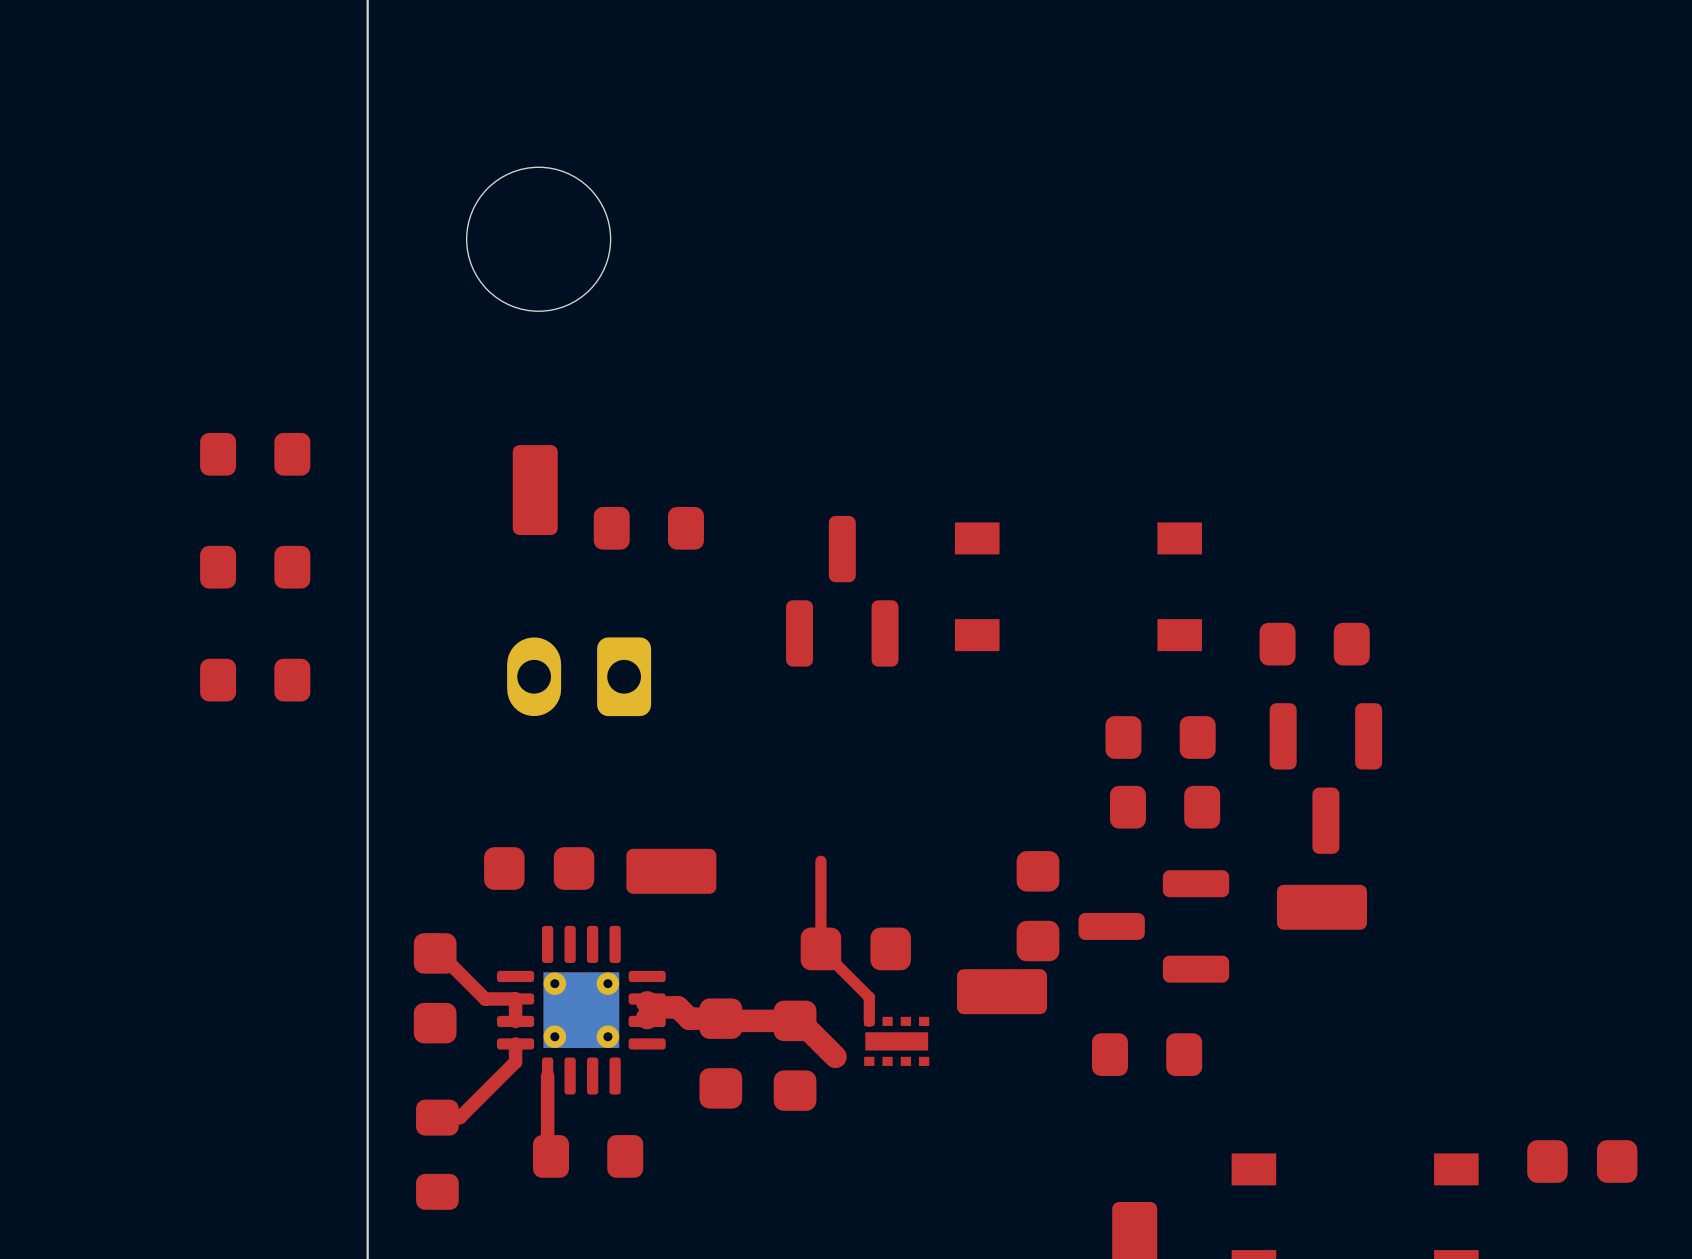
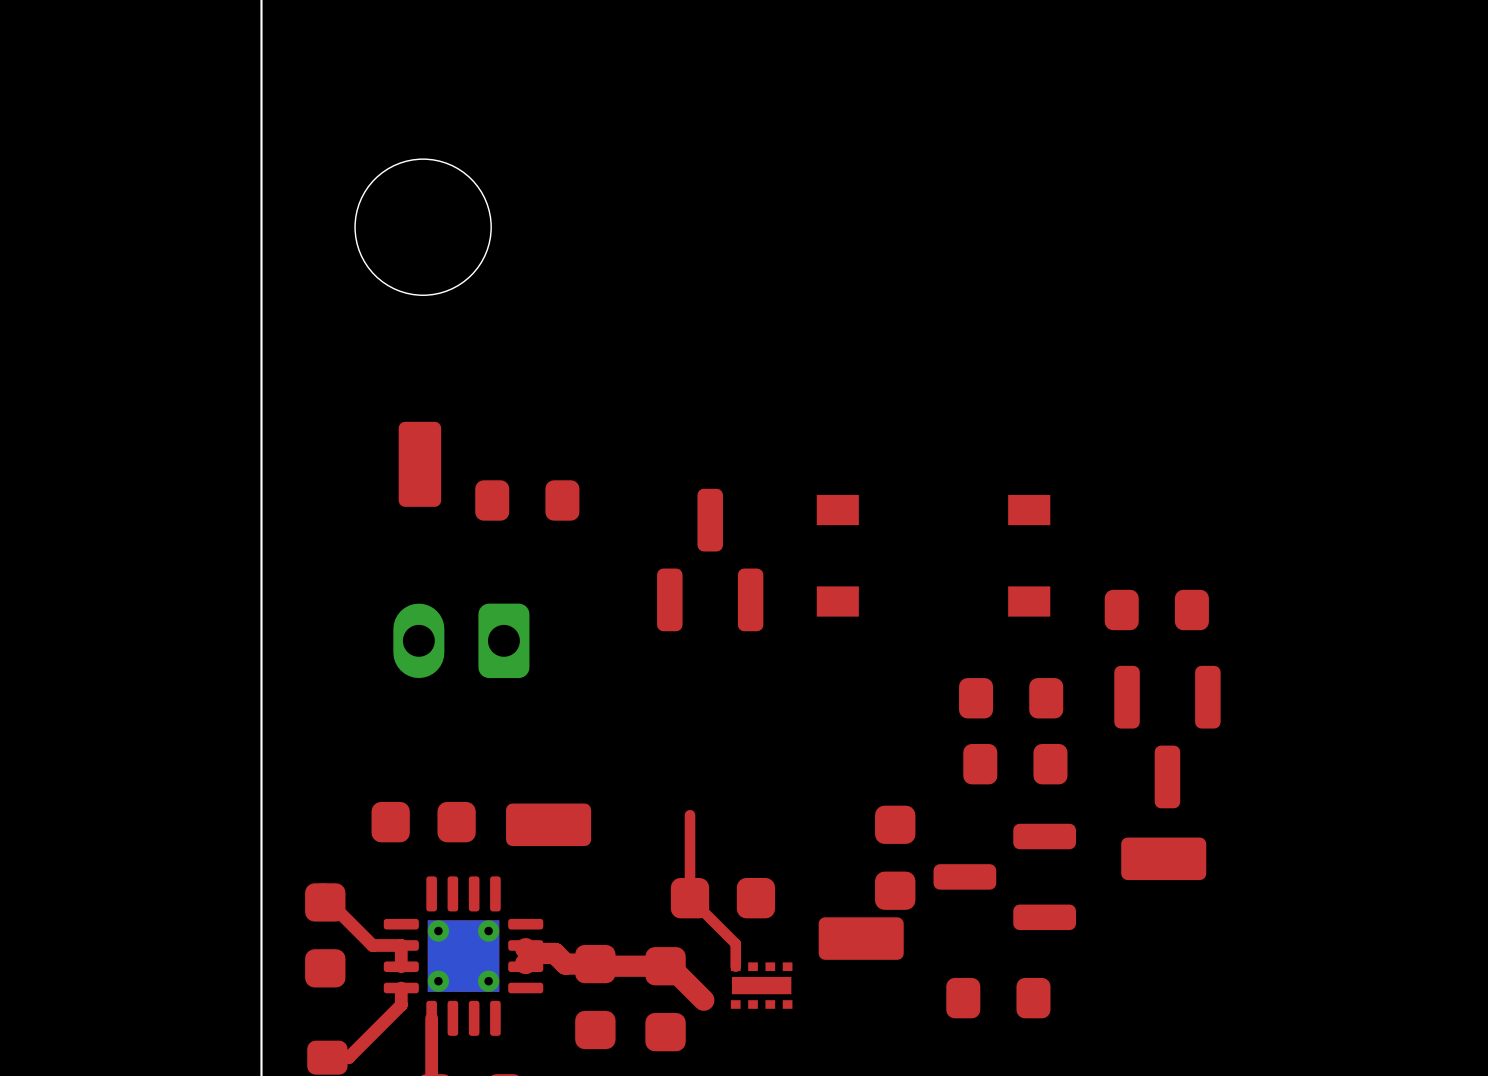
part: (255, 454) -> none
part: (255, 567) -> none
part: (255, 680) -> none

